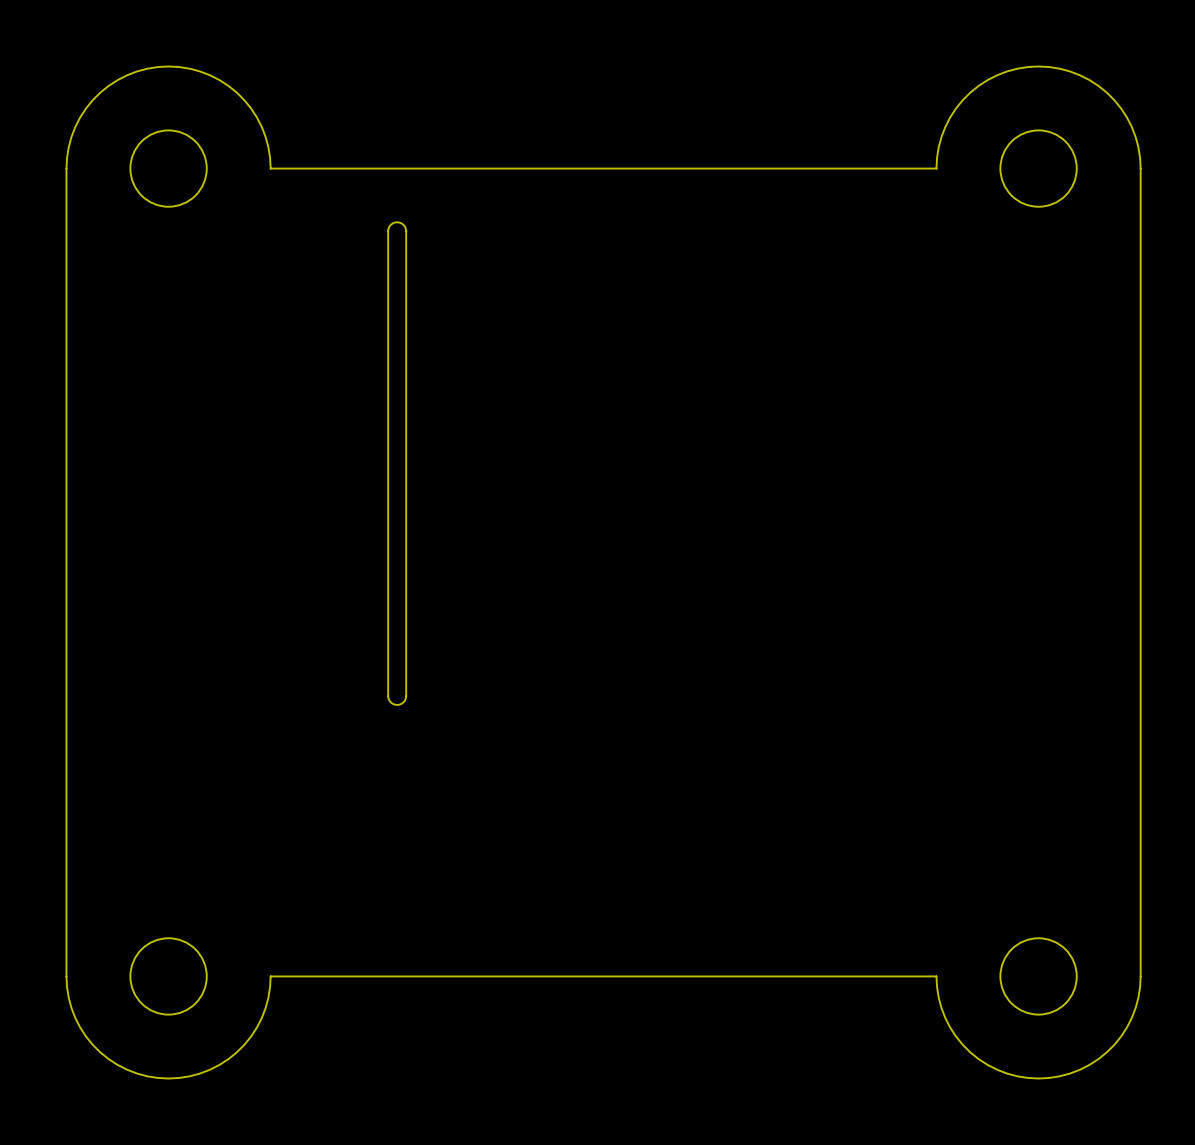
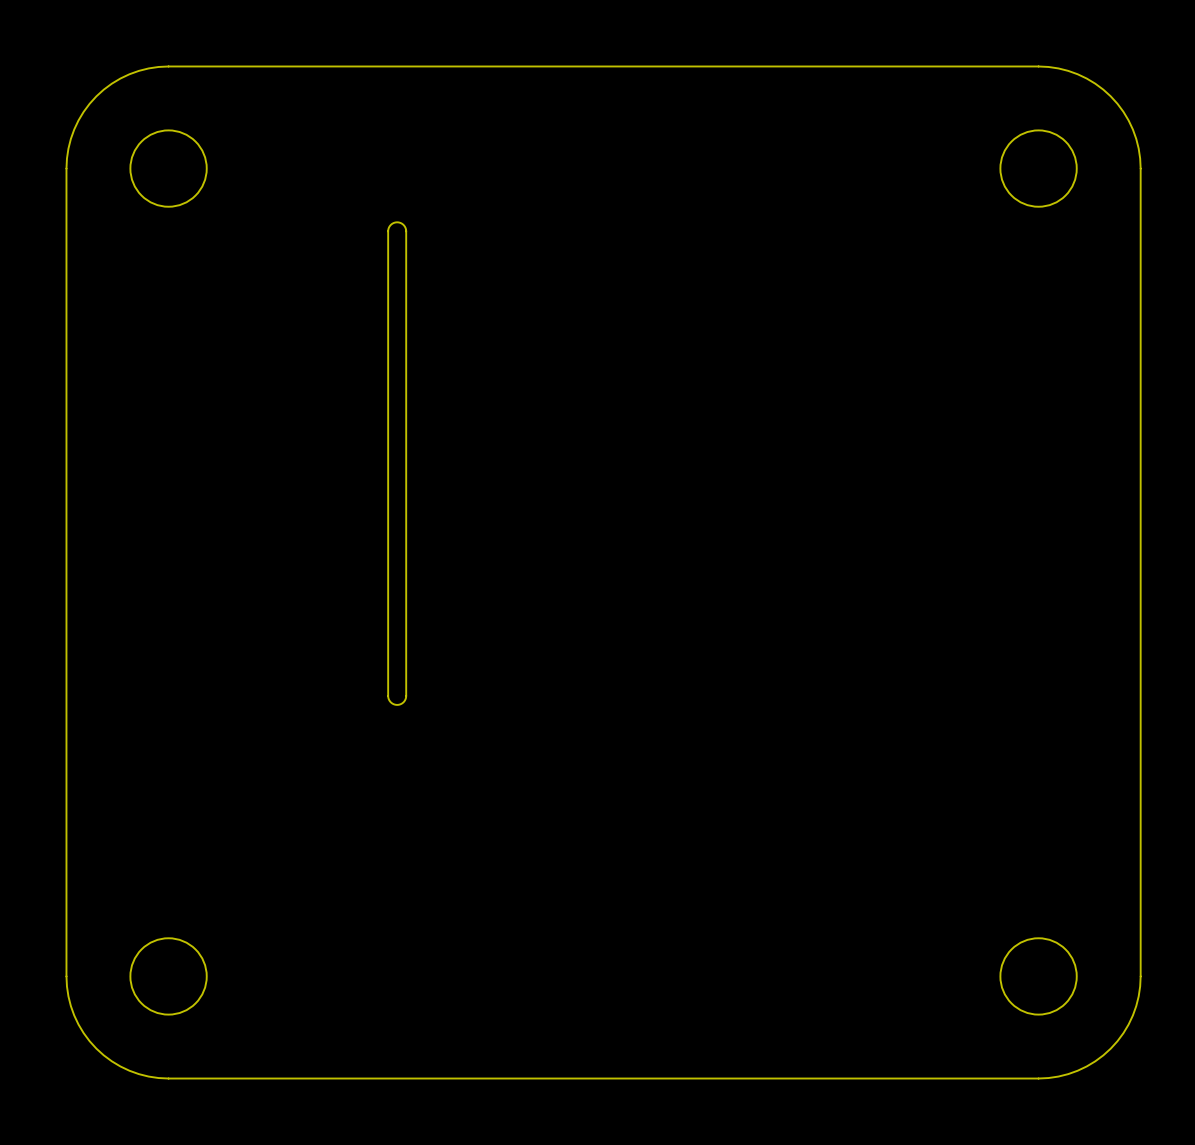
board edge: (1140, 168) (1135, 137) (1126, 117) (1114, 100) (1098, 85) (1080, 75) (1059, 68) (1038, 66) (1007, 71) (987, 80) (970, 92) (955, 108) (945, 127) (938, 147) (936, 168) (270, 168) (268, 147) (261, 127) (251, 108) (236, 92) (219, 80) (200, 71) (179, 67) (157, 67) (137, 71) (117, 80) (92, 100) (80, 117) (71, 137) (66, 168) -> (1140, 168) (1138, 148) (1132, 129) (1123, 111) (1110, 96) (1095, 83) (1077, 74) (1058, 68) (1038, 66) (158, 66) (138, 70) (120, 78) (103, 89) (89, 103) (78, 120) (70, 138) (66, 168)
board edge: (1140, 976) (1135, 1007) (1126, 1027) (1114, 1044) (1098, 1059) (1080, 1069) (1059, 1076) (1038, 1078) (1007, 1073) (987, 1064) (970, 1052) (955, 1036) (945, 1017) (938, 997) (936, 976) (270, 976) (268, 997) (261, 1017) (251, 1036) (236, 1052) (219, 1064) (200, 1073) (179, 1077) (157, 1077) (127, 1069) (108, 1059) (92, 1044) (80, 1027) (71, 1007) (66, 976) -> (1140, 976) (1138, 996) (1132, 1015) (1123, 1033) (1110, 1048) (1095, 1061) (1077, 1070) (1058, 1076) (1038, 1078) (158, 1078) (138, 1074) (120, 1066) (103, 1055) (89, 1041) (74, 1015) (68, 996) (66, 976)

